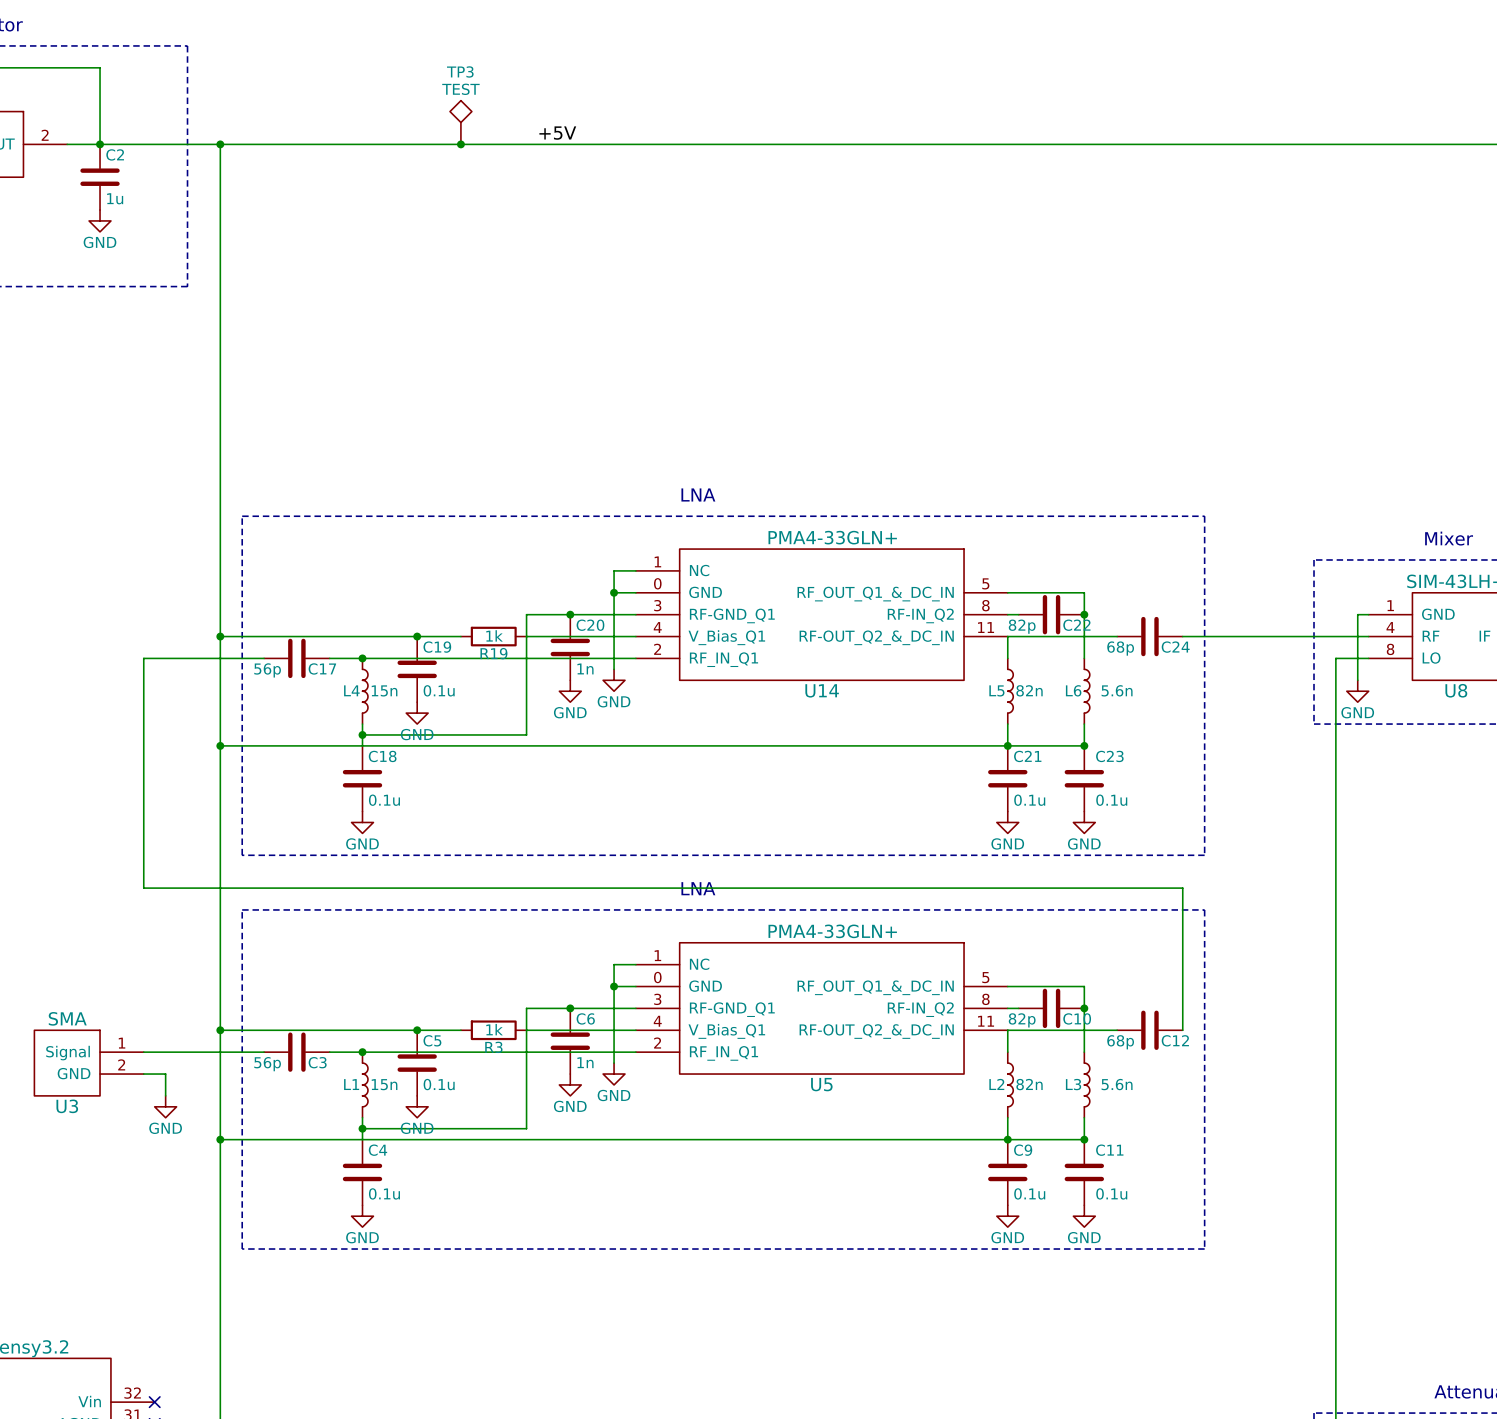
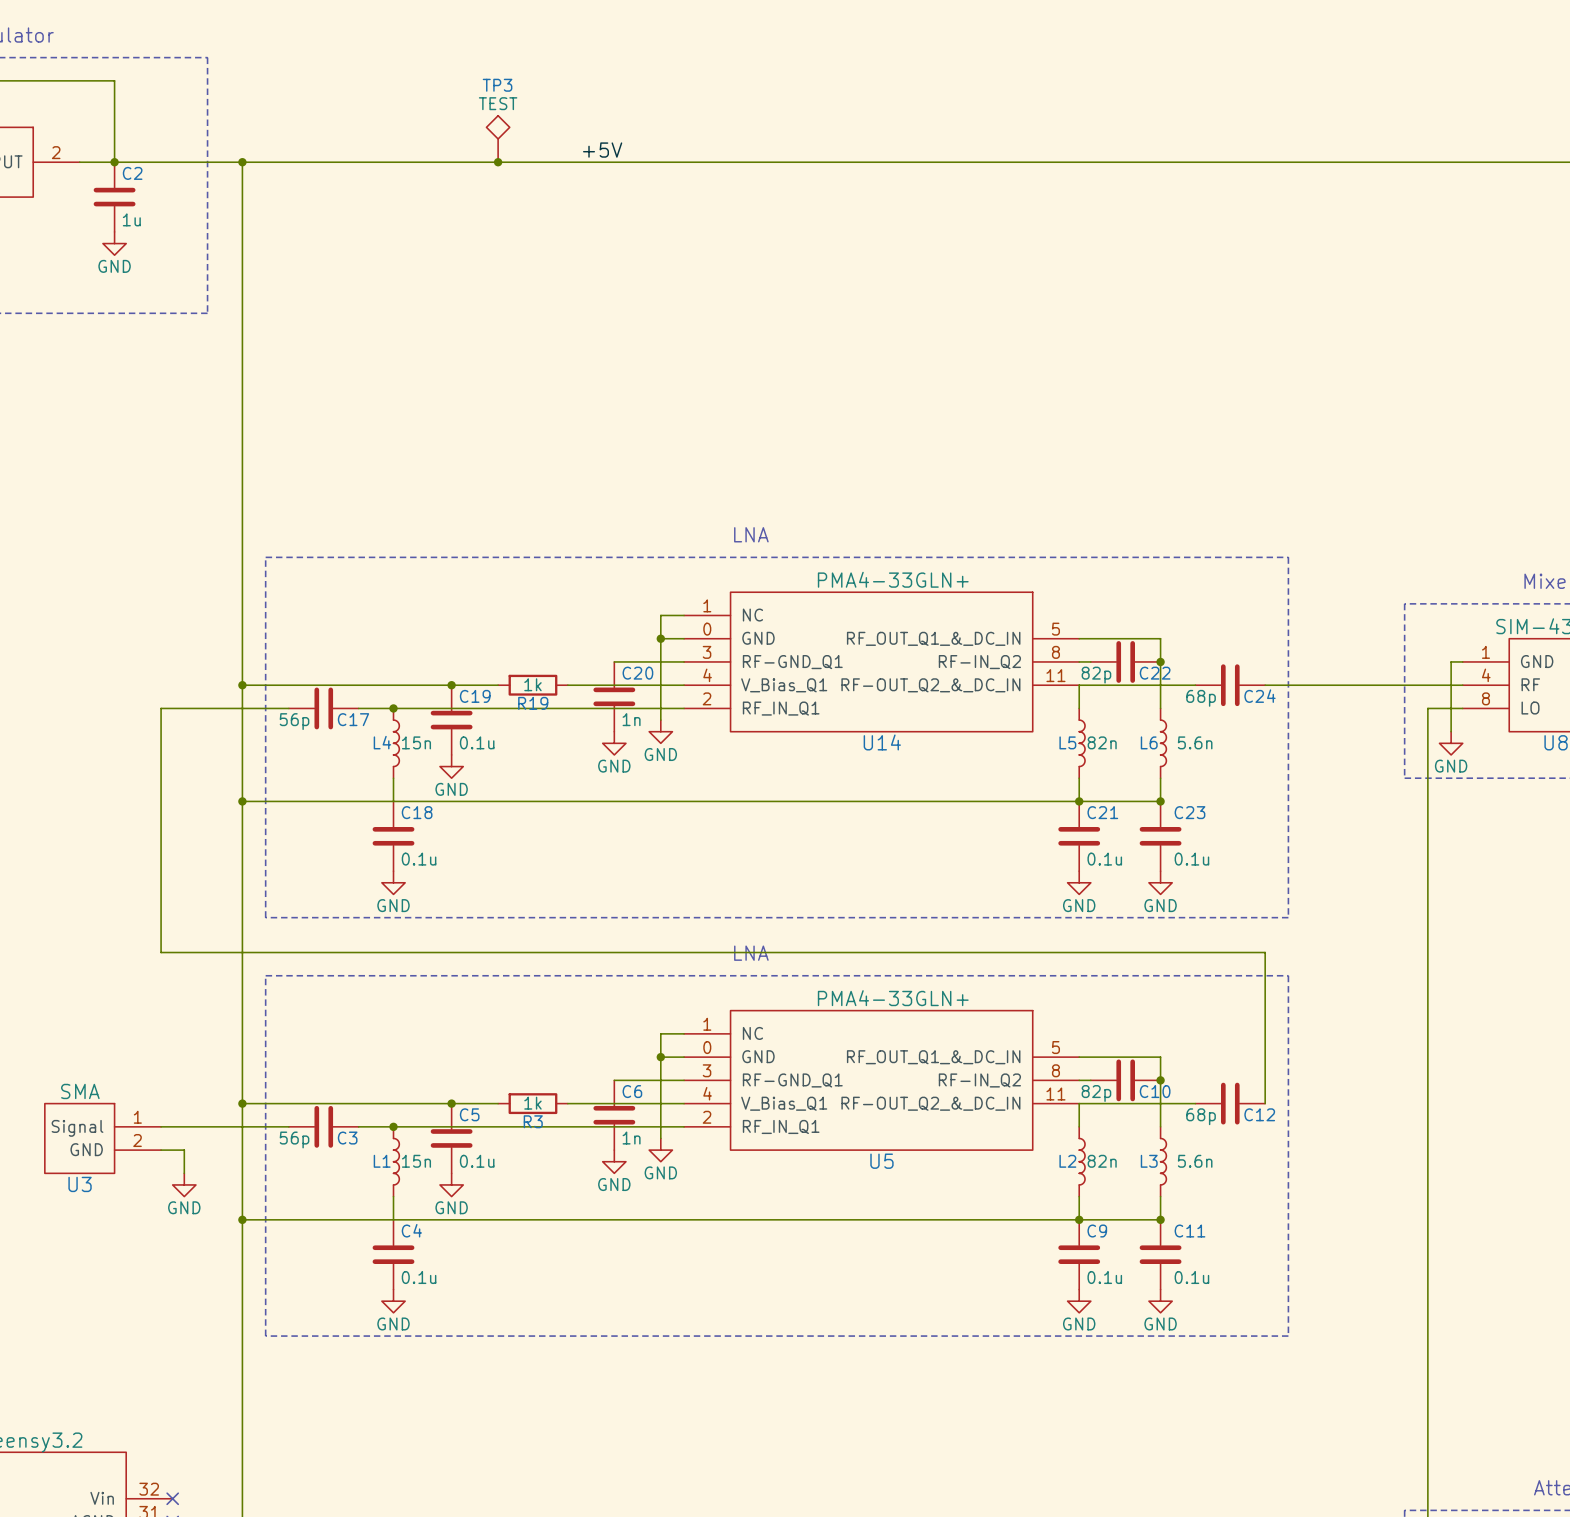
wire: (570, 614) (526, 614) (526, 734) (362, 734) -> none
junction: (570, 614) -> none
junction: (362, 734) -> none
wire: (570, 1008) (526, 1008) (526, 1128) (362, 1128) -> none
junction: (570, 1008) -> none
junction: (362, 1128) -> none

